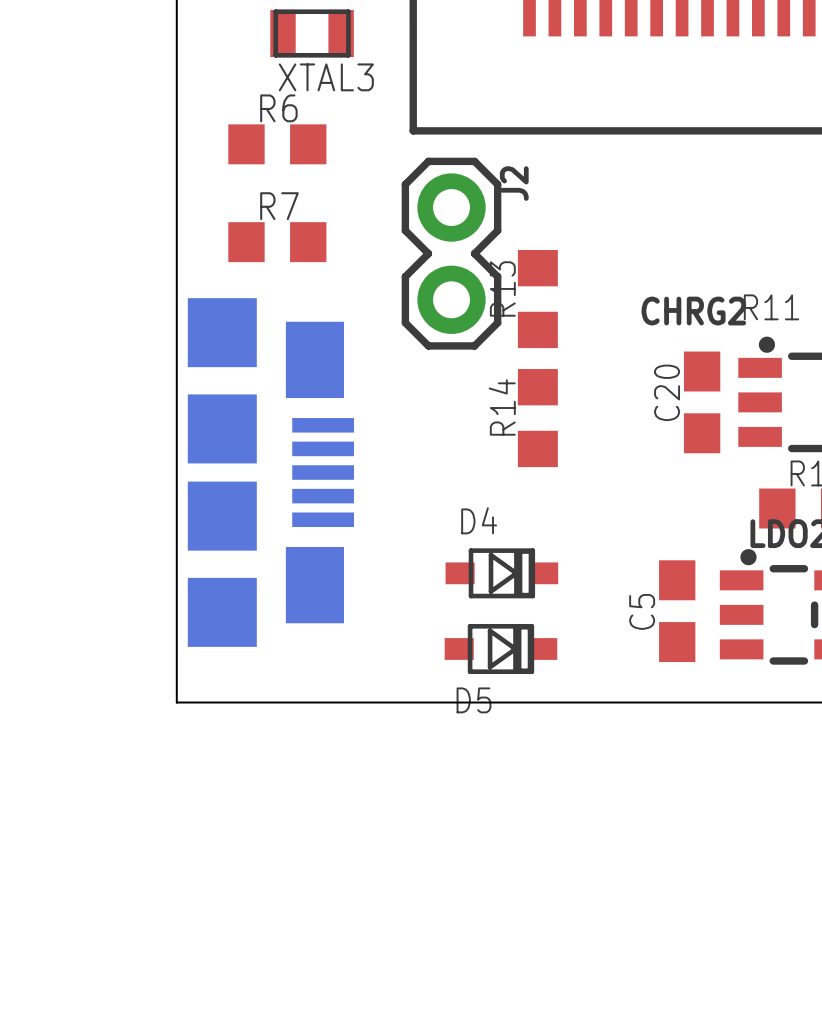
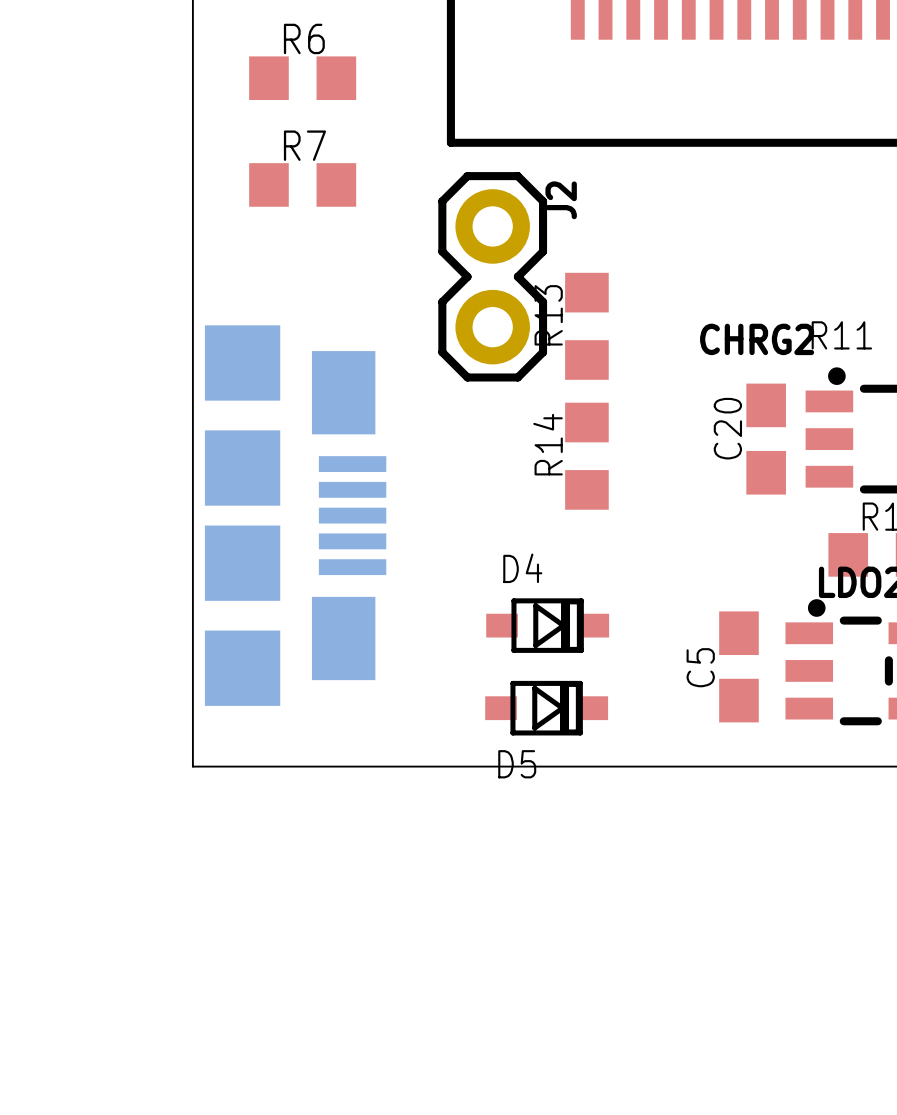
XTAL3: (312, 33) -> none
R6 position: (277, 144) -> (302, 78)
R7 position: (277, 242) -> (302, 184)

